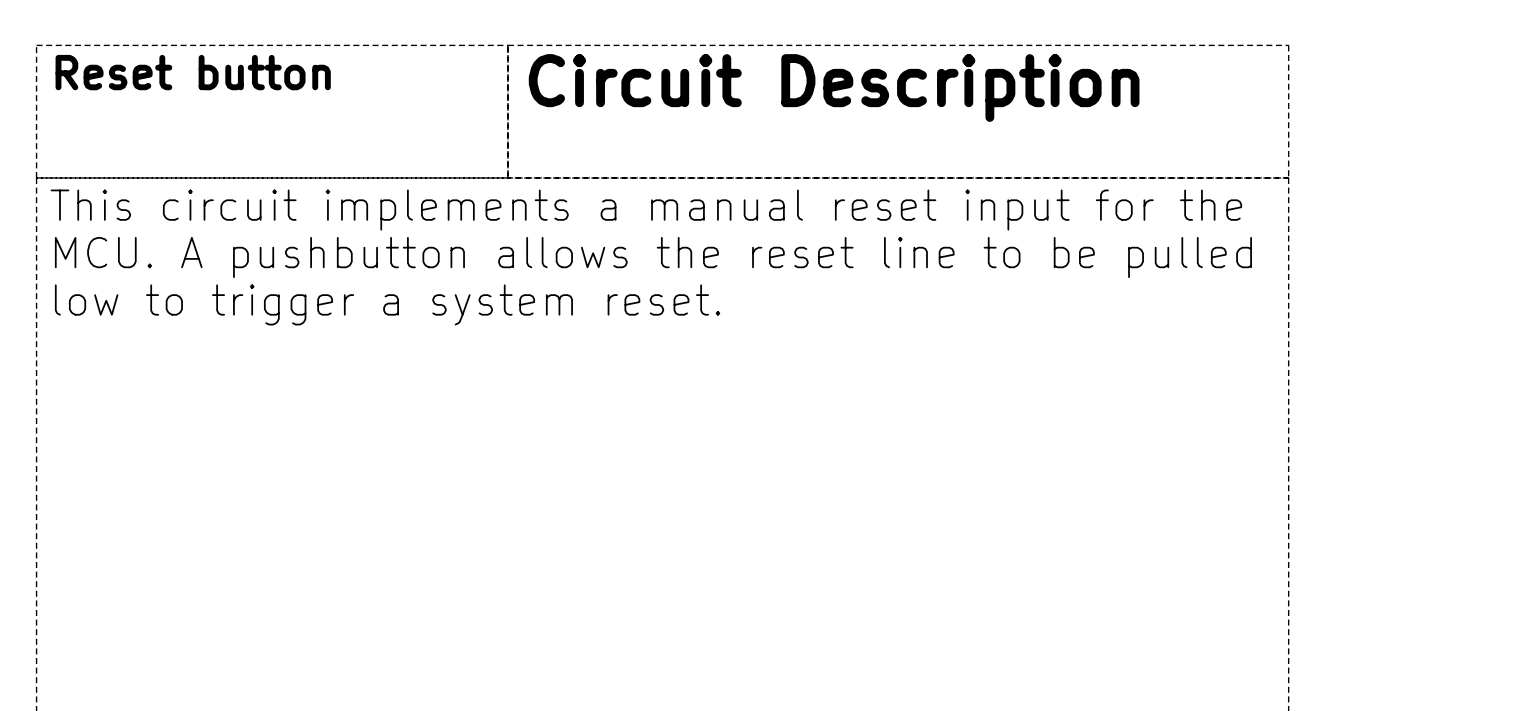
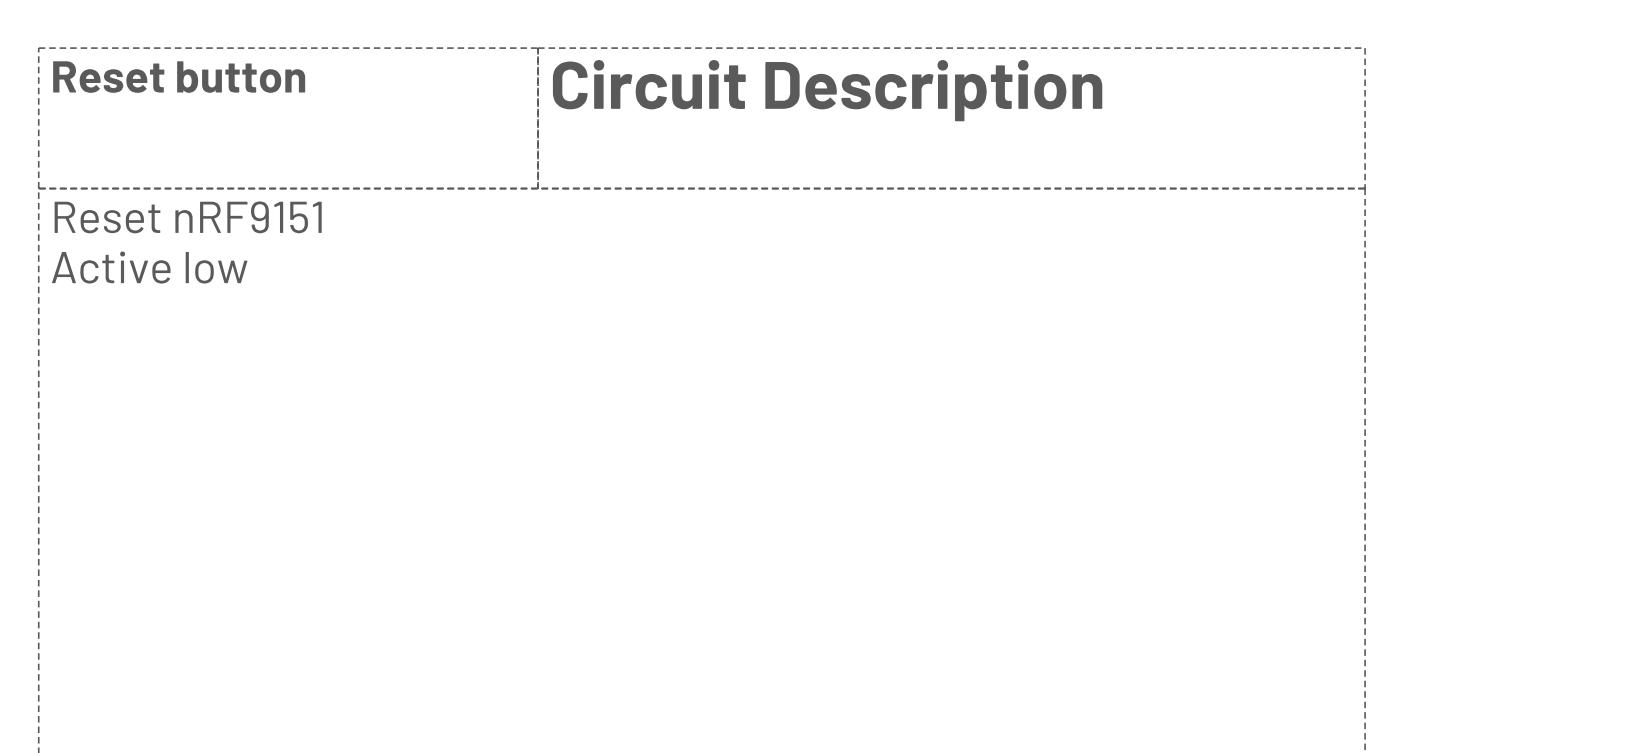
text: This circuit implements a manual reset input for the (646, 210) -> Reset nRF9151 (188, 217)
text: MCU. A pushbutton allows the reset line to be pulled (653, 257) -> Active low (149, 267)
text: low to trigger a system reset. (387, 304) -> none

